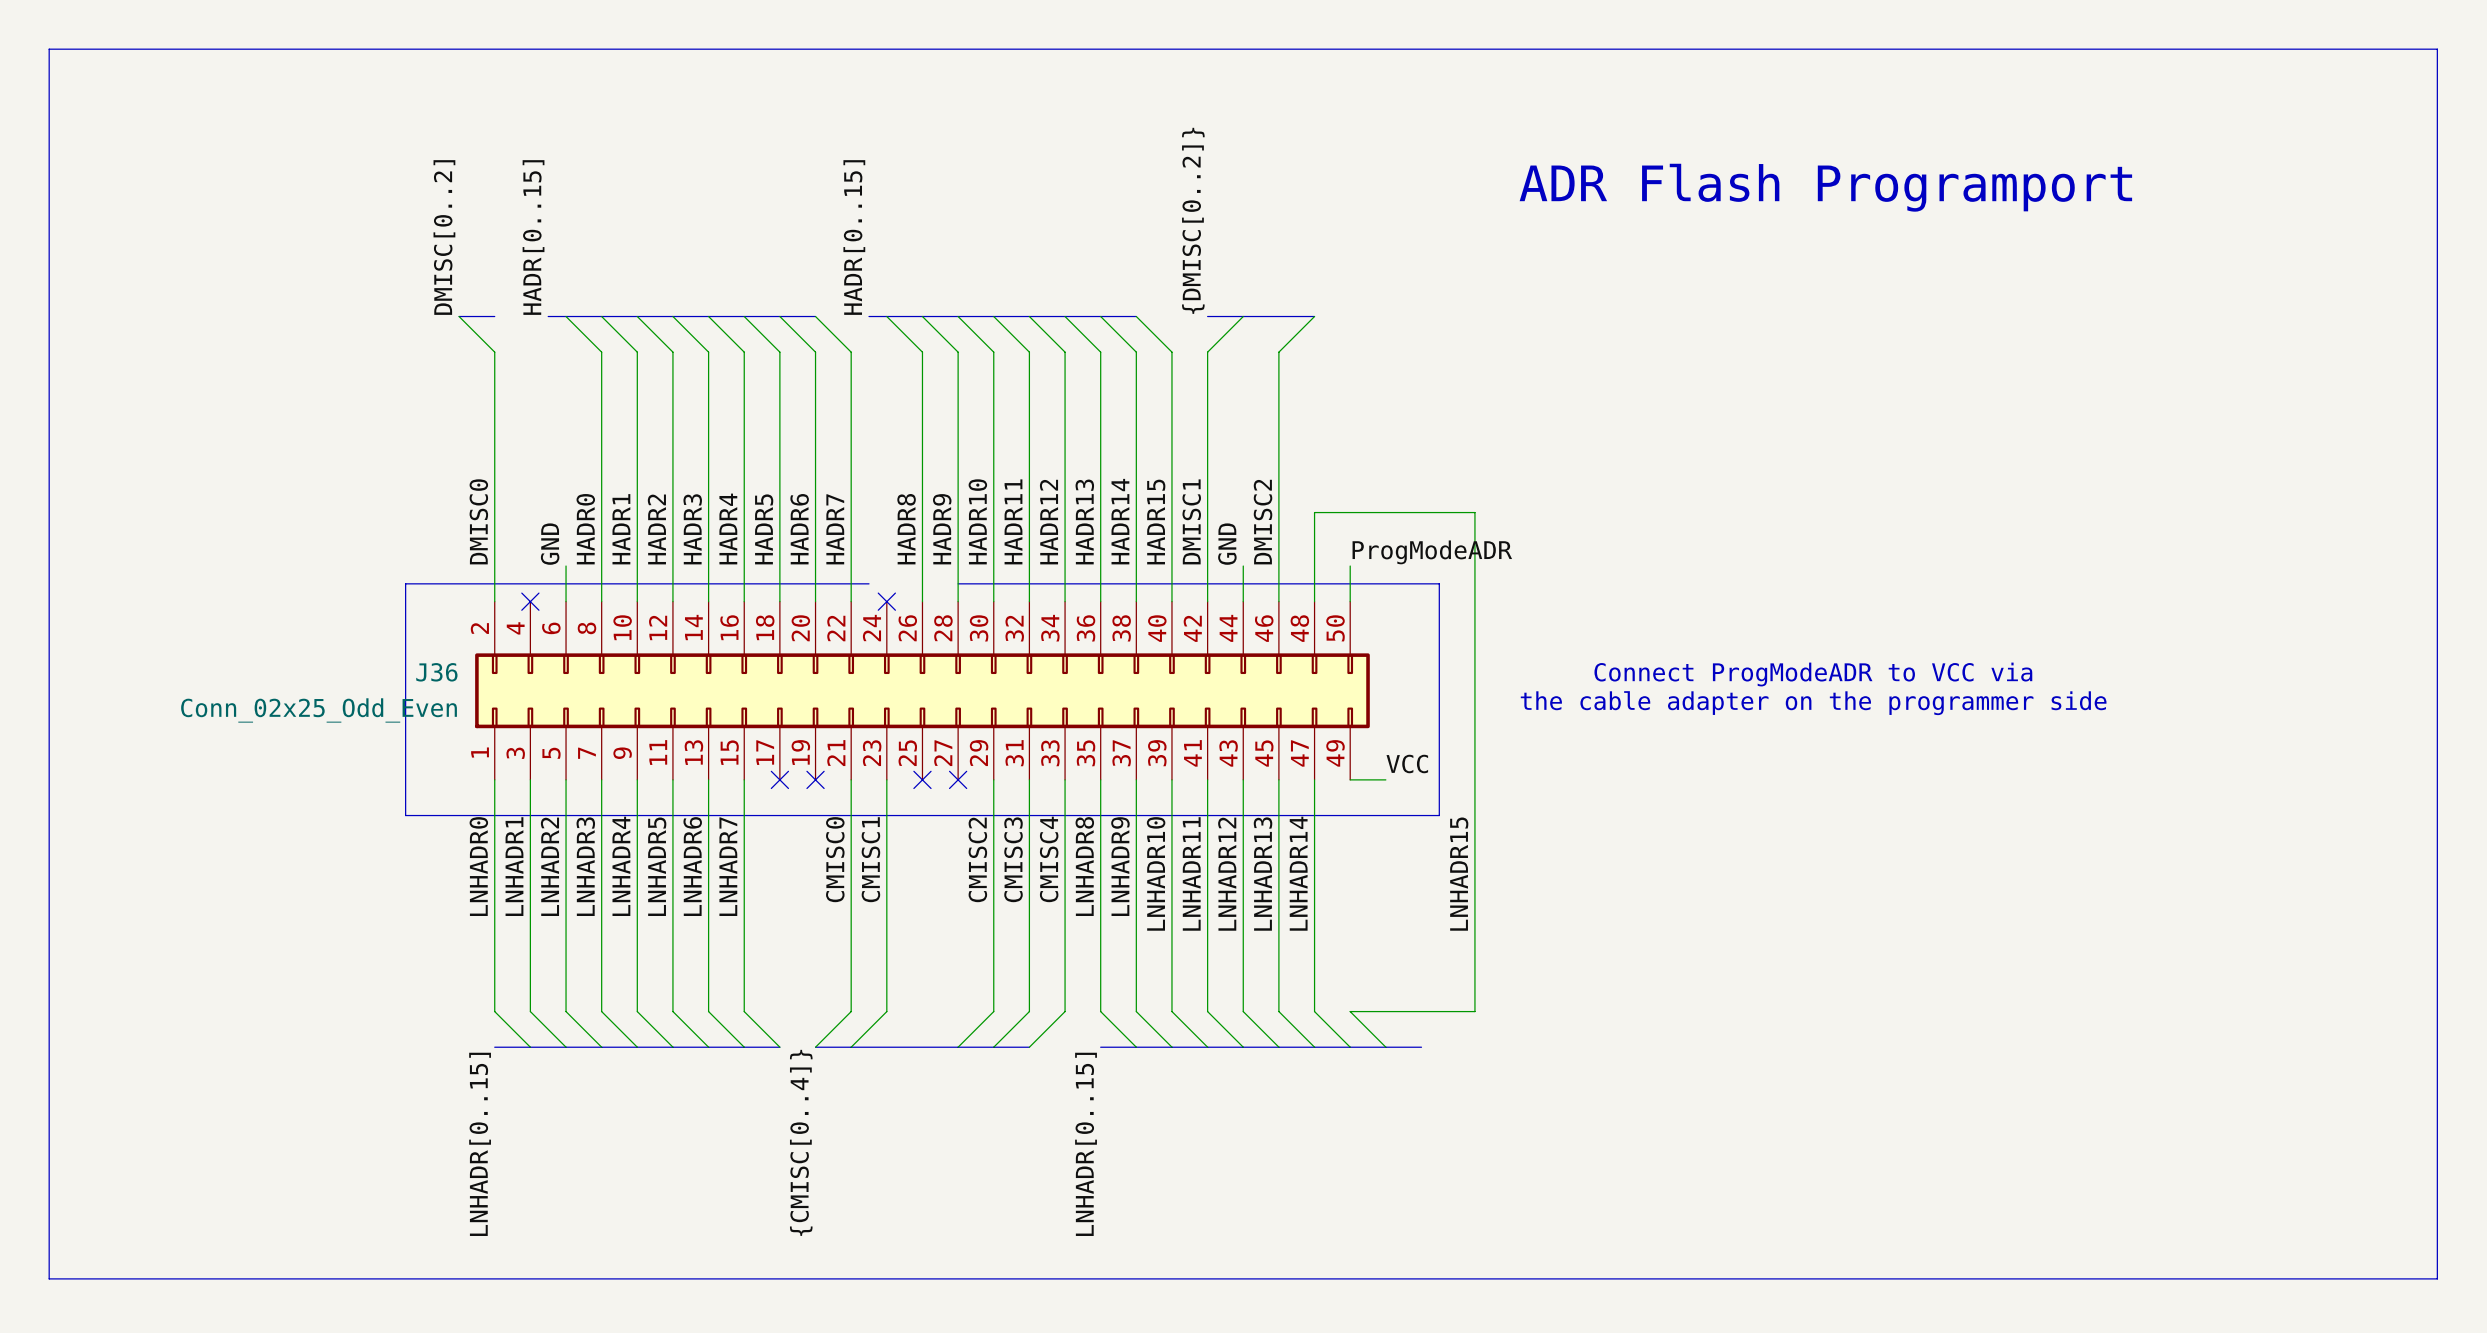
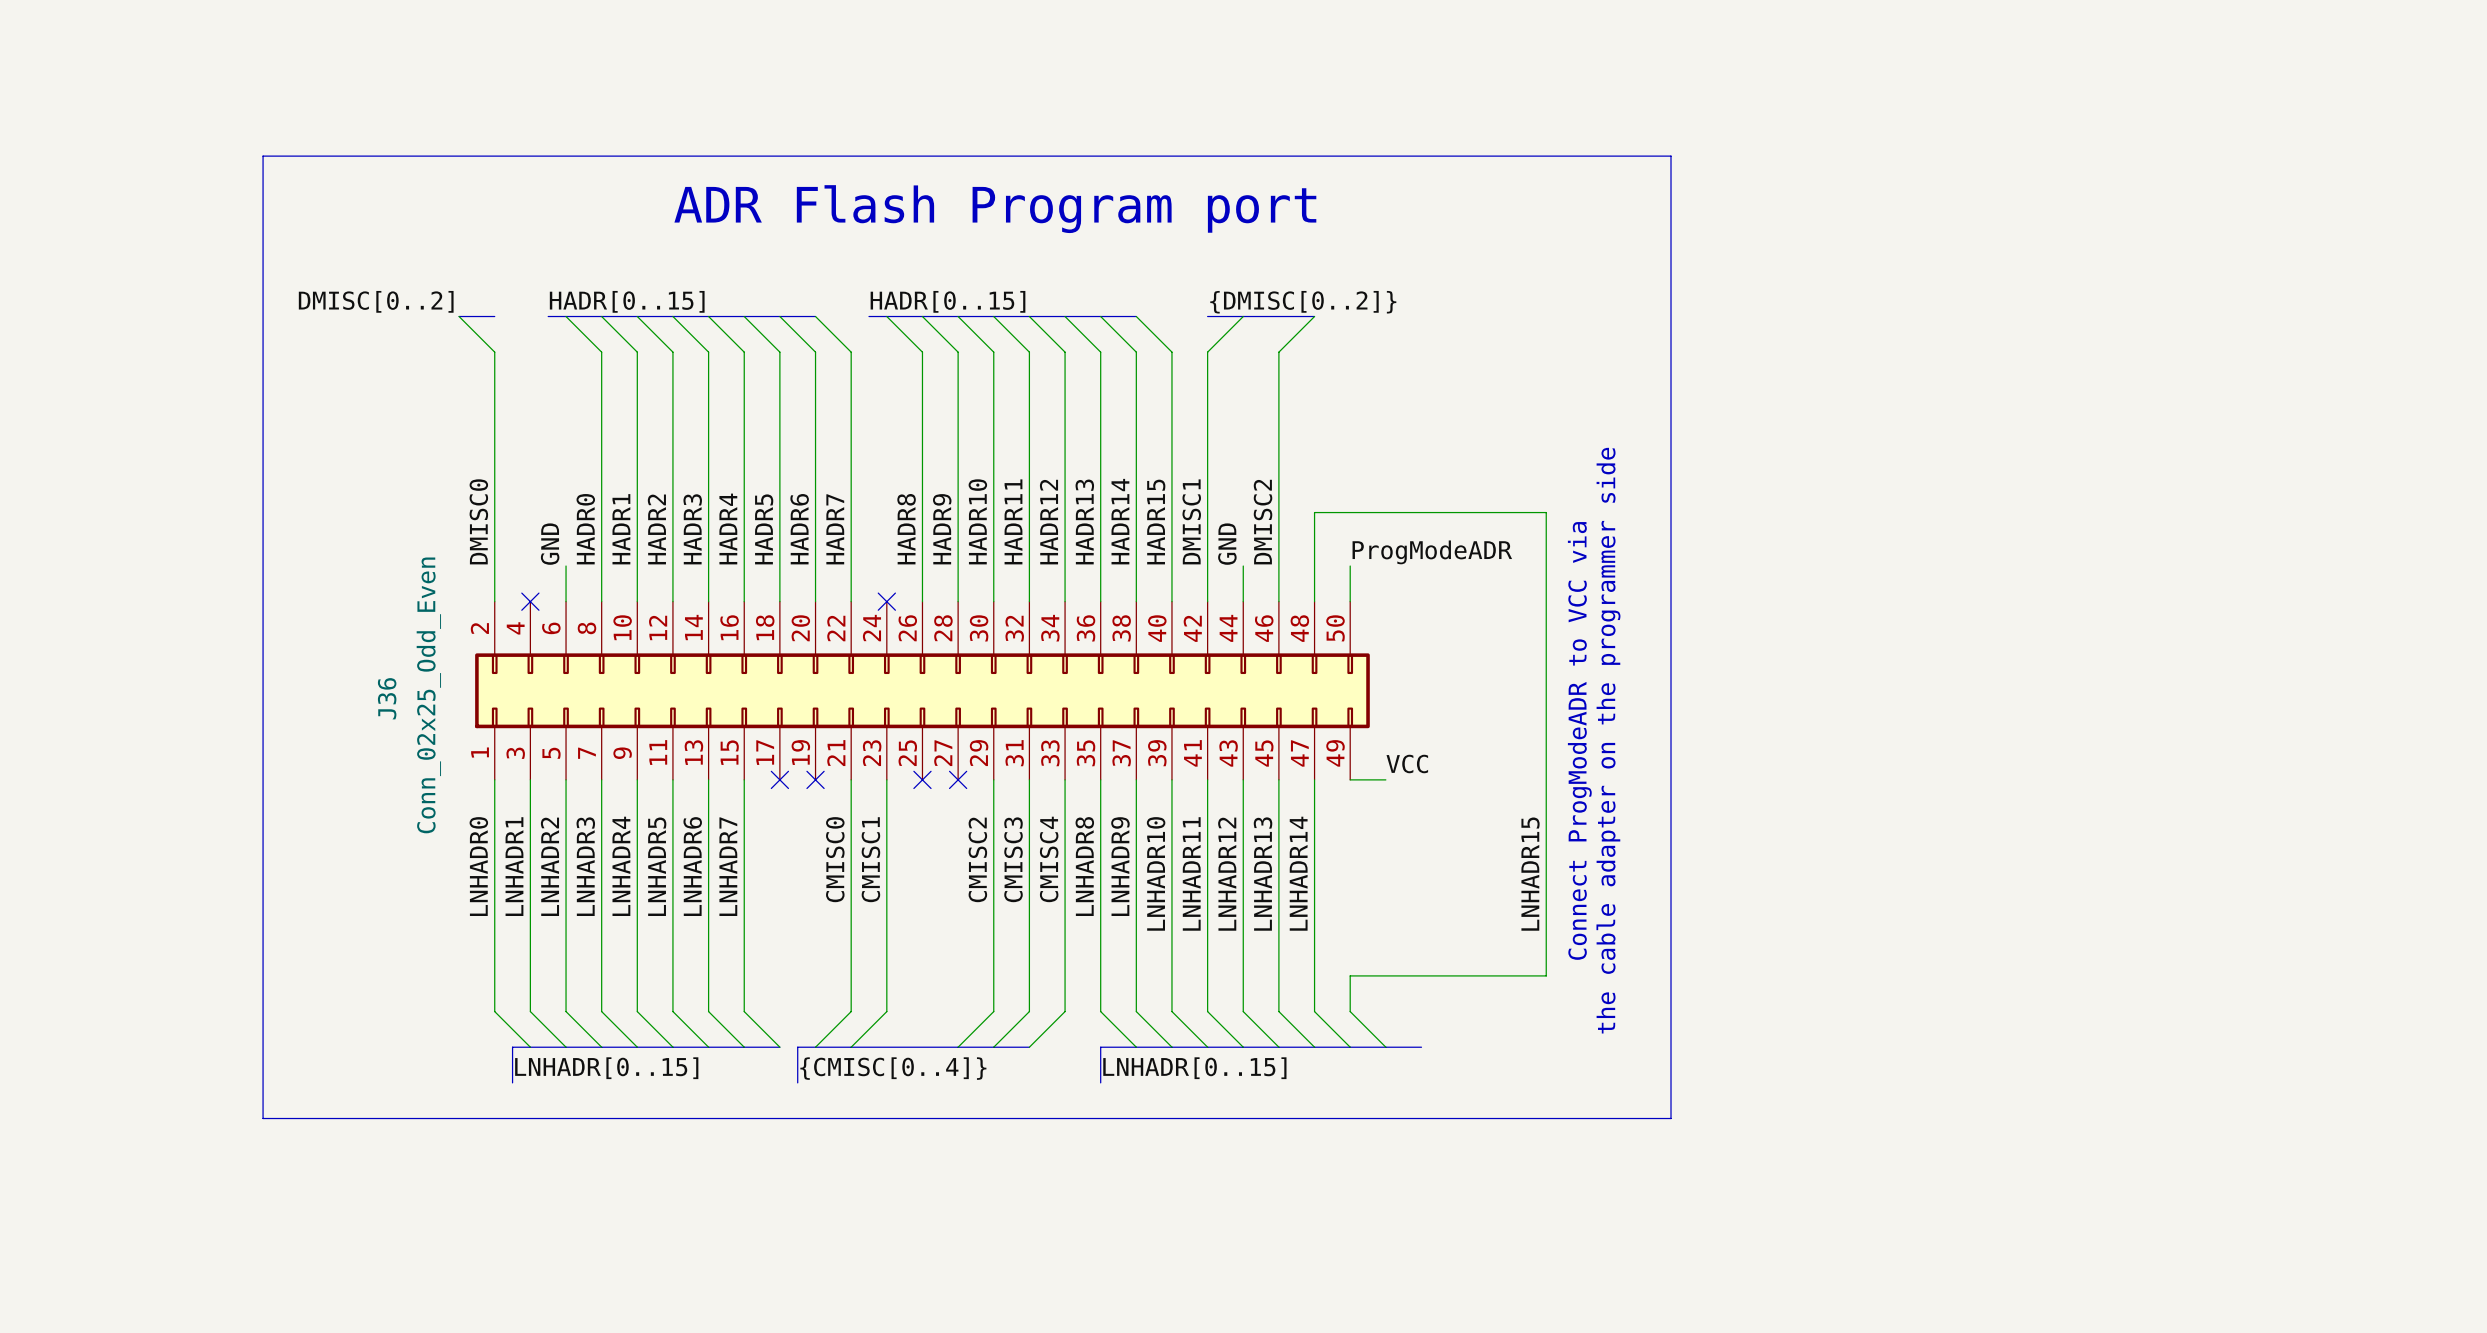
line: (49, 49) (2437, 49) (2437, 1278) (49, 1278) (49, 49) -> none
line: none -> (263, 156) (1671, 156) (1671, 1118) (263, 1118) (263, 156)
text: ADR Flash Programport (1825, 187) -> none
text: none -> ADR Flash Program port (995, 209)
label rotation: 0° (1193, 220) -> 90° clockwise (1303, 302)
label rotation: 0° (444, 237) -> 90° clockwise (376, 301)
label rotation: 0° (533, 237) -> 90° clockwise (627, 301)
label rotation: 0° (854, 237) -> 90° clockwise (948, 301)
wire: (1474, 512) (1474, 1011) (1350, 1011) -> (1474, 512) (1546, 512) (1546, 975) (1350, 975) (1350, 1011)
line: (869, 583) (405, 583) (405, 815) (1439, 815) (1439, 583) (958, 583) -> none
J36 name rotation: 0° (436, 672) -> 90° counterclockwise (387, 698)
text rotation: 0° (1813, 674) -> 90° counterclockwise (1579, 740)
text rotation: 0° (1813, 703) -> 90° counterclockwise (1608, 740)
J36 value rotation: 0° (319, 710) -> 90° counterclockwise (428, 695)
label position: LNHADR15 (1459, 874) -> LNHADR15 (1530, 874)
bus: (494, 1047) (512, 1047) -> (512, 1082) (512, 1047)
bus: none -> (815, 1047) (797, 1047) (797, 1082)
bus: none -> (1100, 1047) (1100, 1082)
label rotation: 0° (801, 1142) -> 90° clockwise (893, 1068)
label rotation: 0° (480, 1144) -> 90° clockwise (606, 1068)
label rotation: 0° (1086, 1144) -> 90° clockwise (1194, 1068)

